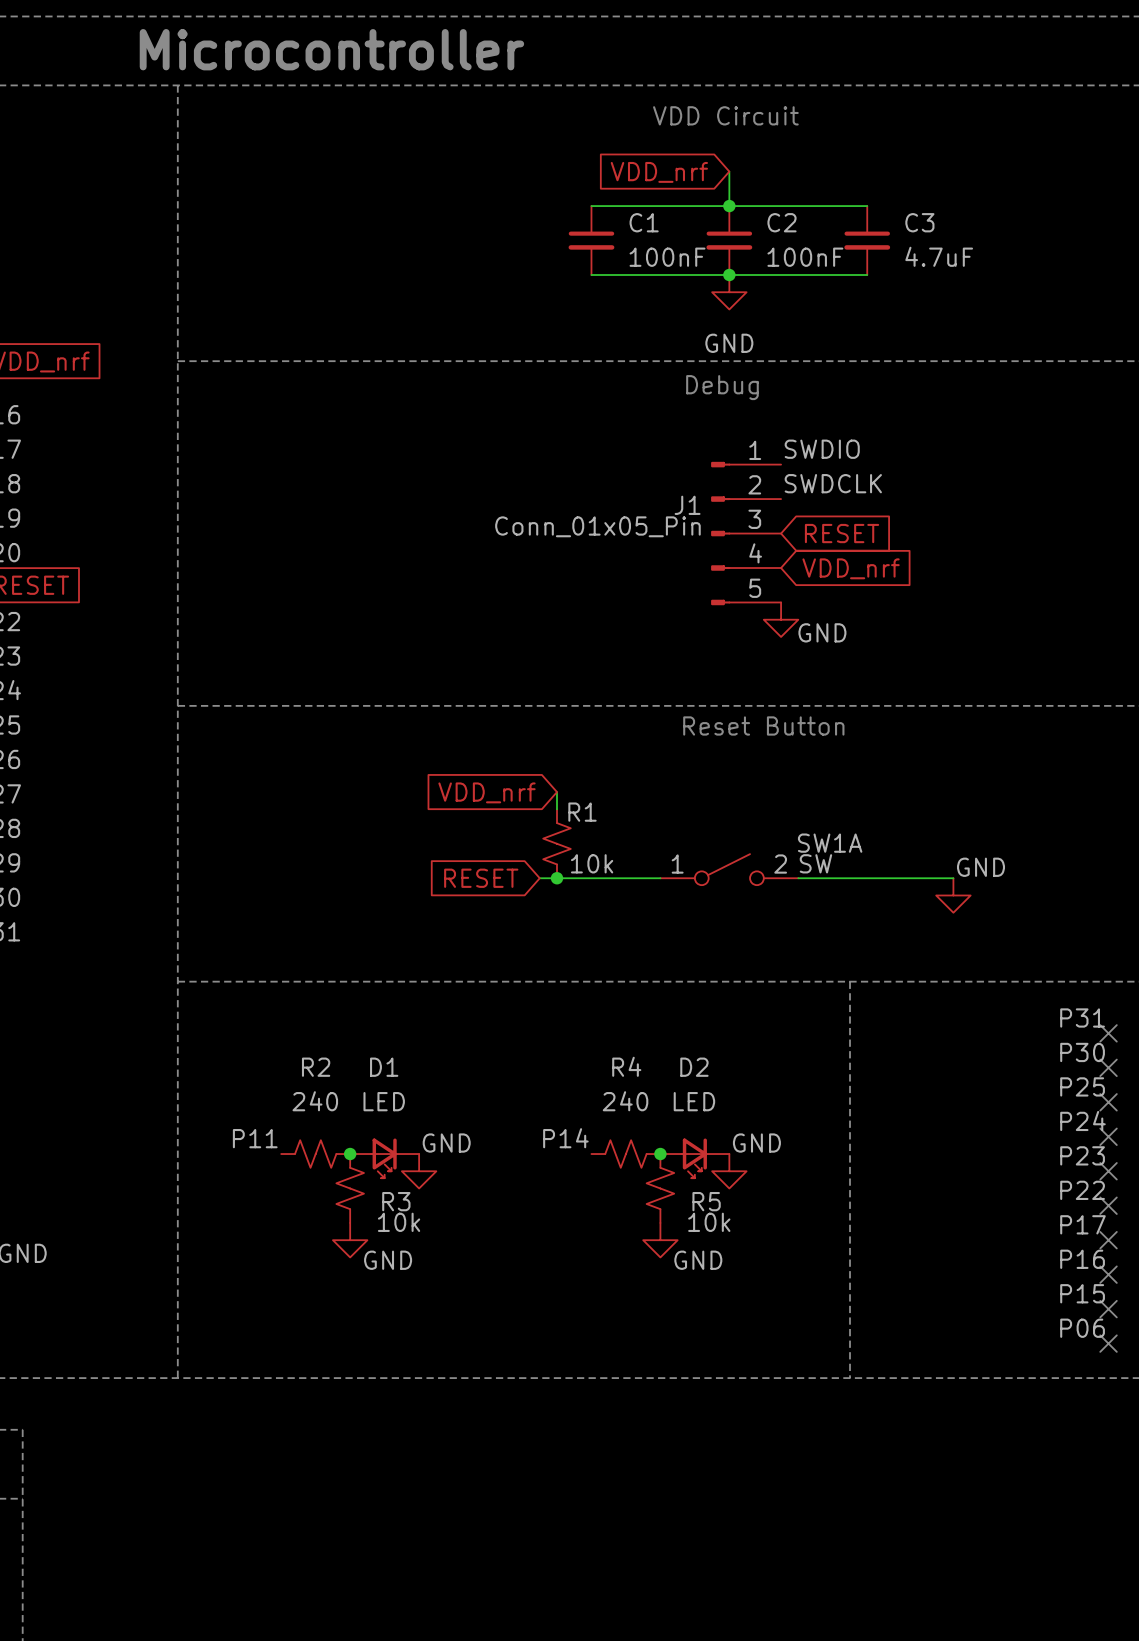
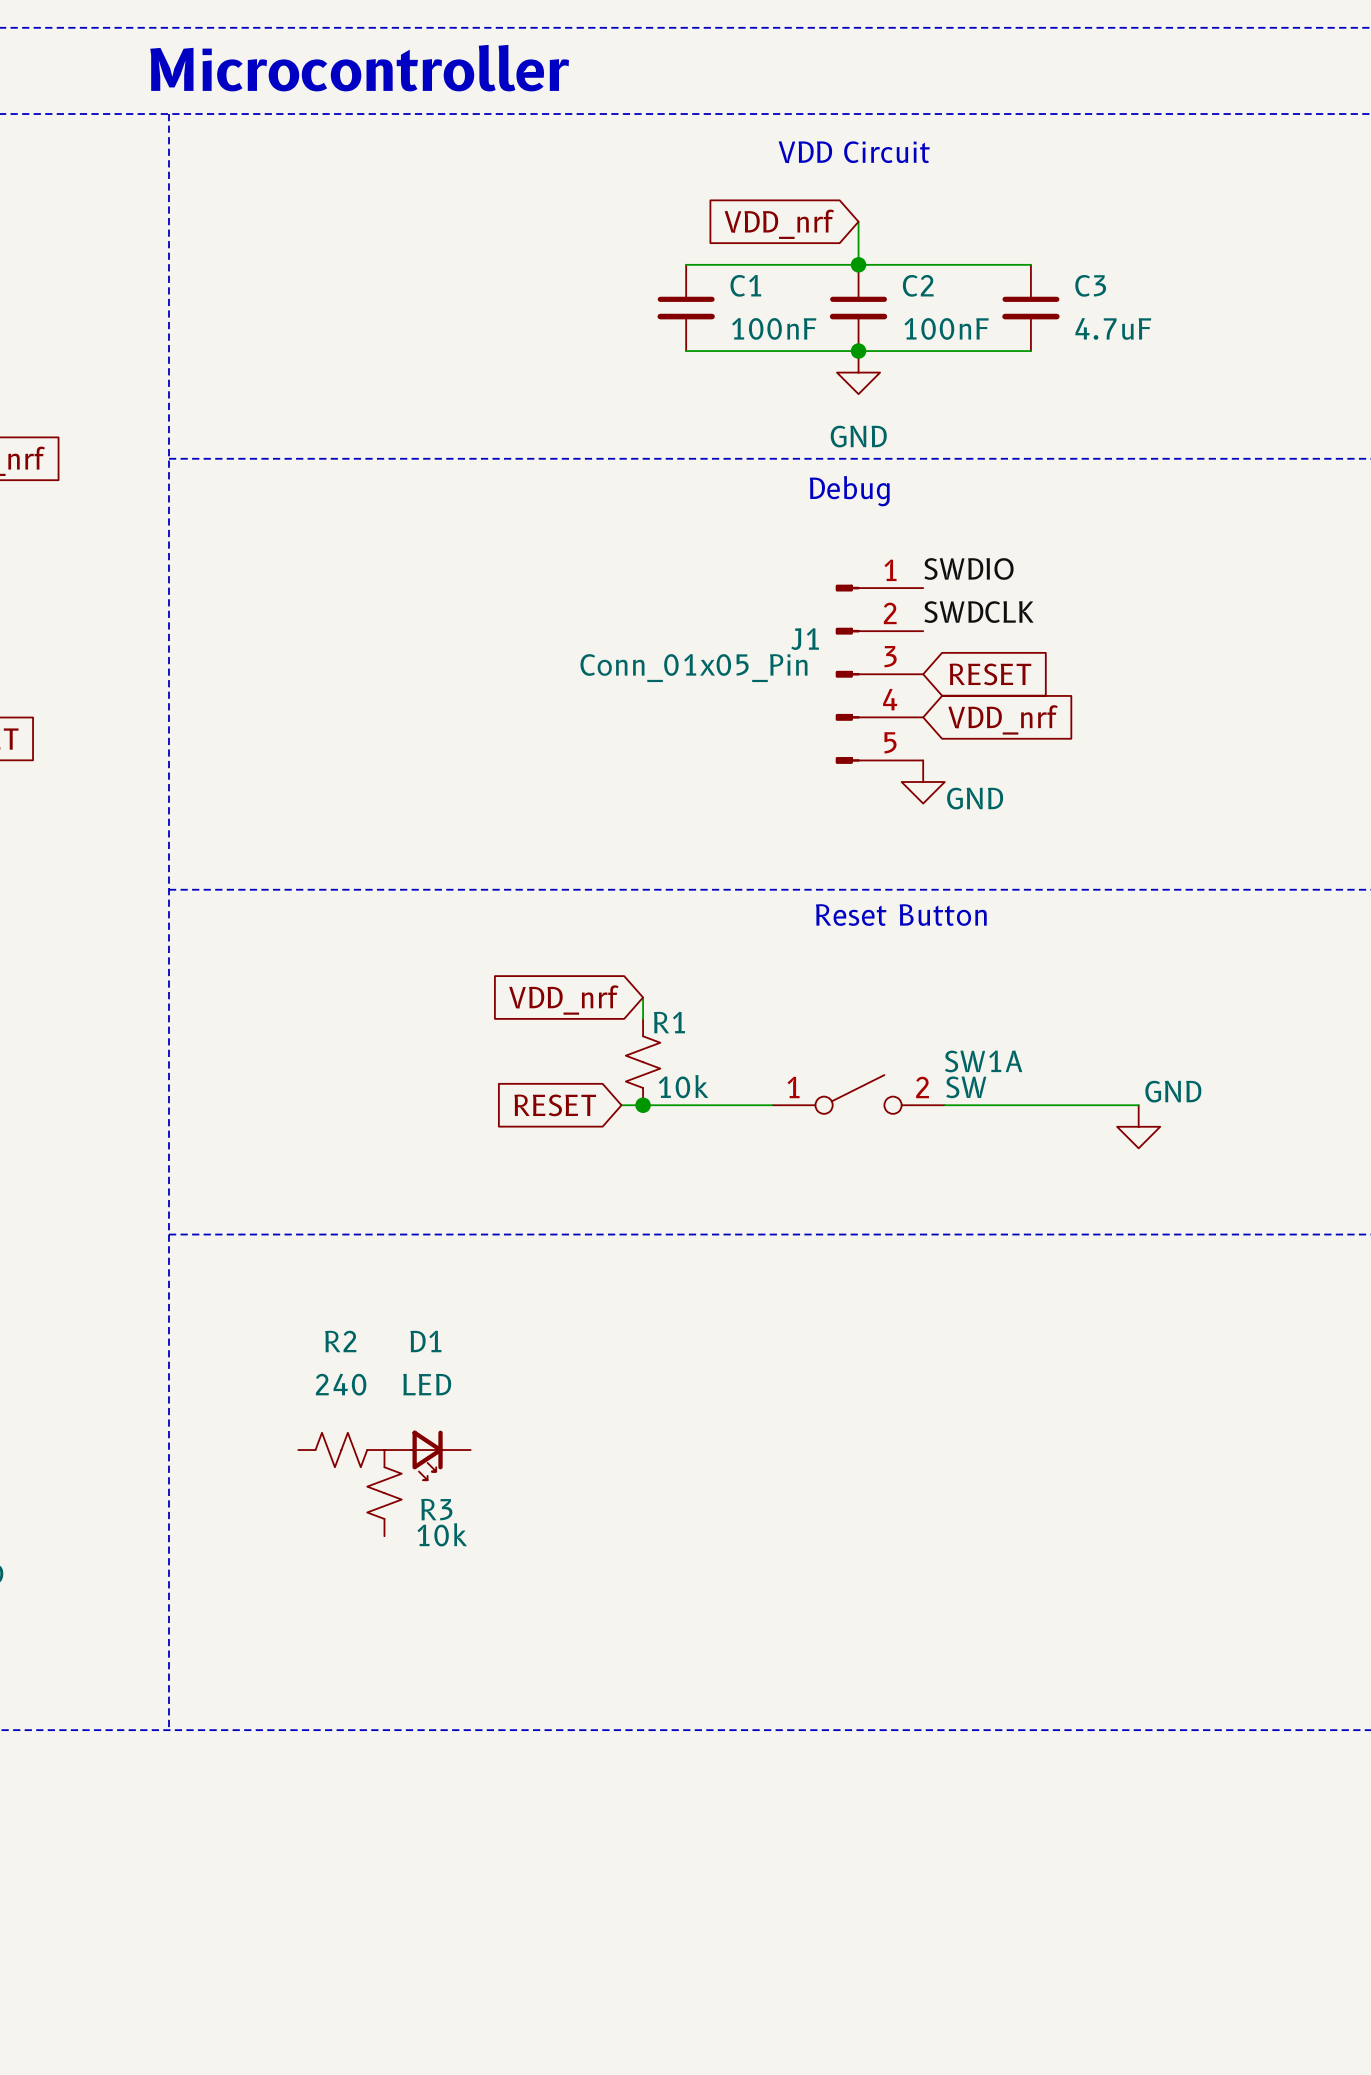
line: (850, 981) (850, 1378) -> none
label: P31 (1082, 1017) -> none
no-connect mark: (1108, 1033) -> none
label: P30 (1082, 1052) -> none
no-connect mark: (1108, 1067) -> none
label: P25 (1082, 1086) -> none
no-connect mark: (1108, 1102) -> none
label: P24 (1082, 1120) -> none
no-connect mark: (1108, 1136) -> none
label: P11 (255, 1138) -> none
label: P14 (565, 1138) -> none
junction: (350, 1154) -> none
R4: 240 (625, 1154) -> none
junction: (660, 1154) -> none
label: P23 (1082, 1155) -> none
D2: LED (694, 1158) -> none
power symbol: GND (419, 1171) -> none
power symbol: GND (729, 1171) -> none
no-connect mark: (1108, 1171) -> none
R5: 10k (660, 1188) -> none
label: P22 (1082, 1190) -> none
no-connect mark: (1108, 1205) -> none
label: P17 (1082, 1224) -> none
power symbol: GND (350, 1240) -> none
power symbol: GND (660, 1240) -> none
no-connect mark: (1108, 1240) -> none
label: P16 (1082, 1259) -> none
no-connect mark: (1108, 1274) -> none
label: P15 (1082, 1293) -> none
no-connect mark: (1108, 1309) -> none
label: P06 (1082, 1328) -> none
no-connect mark: (1108, 1343) -> none

